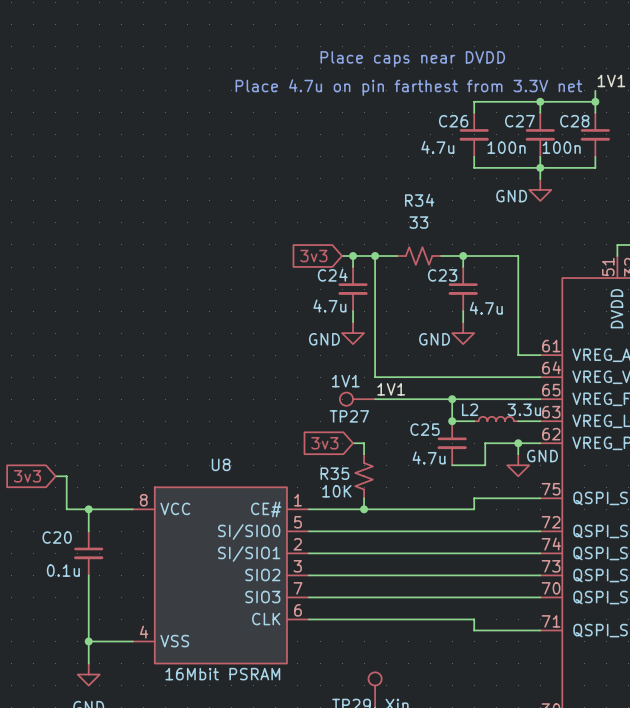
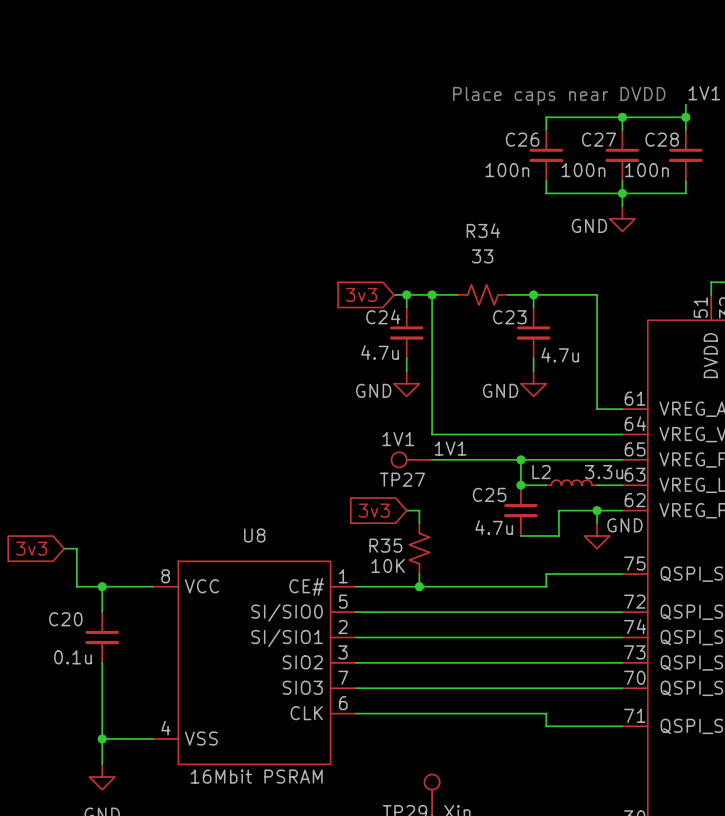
text position: Place caps near DVDD (412, 59) -> Place caps near DVDD (559, 96)
text: Place 4.7u on pin farthest from 3.3V net (408, 87) -> none
C26 value: 4.7u (437, 147) -> 100n (507, 170)

